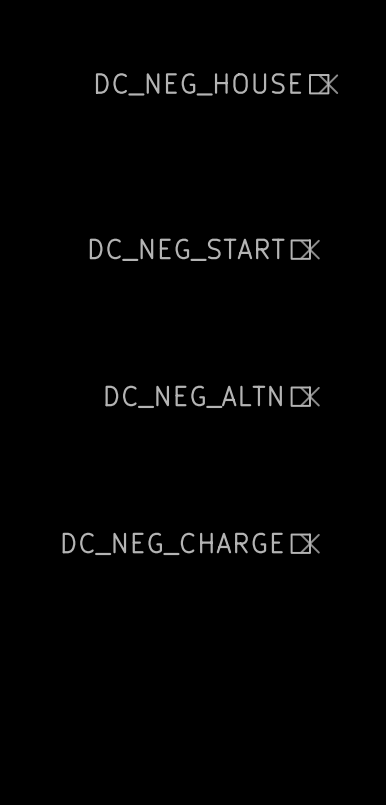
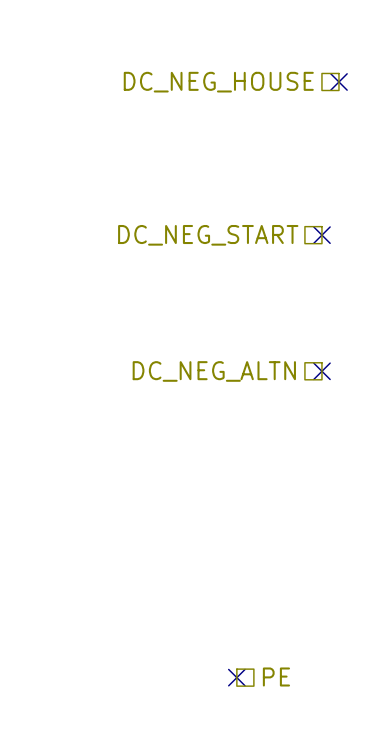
hierarchical label: DC_NEG_CHARGE (172, 543) -> none
no-connect mark: (309, 543) -> none
hierarchical label: none -> PE (276, 676)
no-connect mark: none -> (236, 677)

